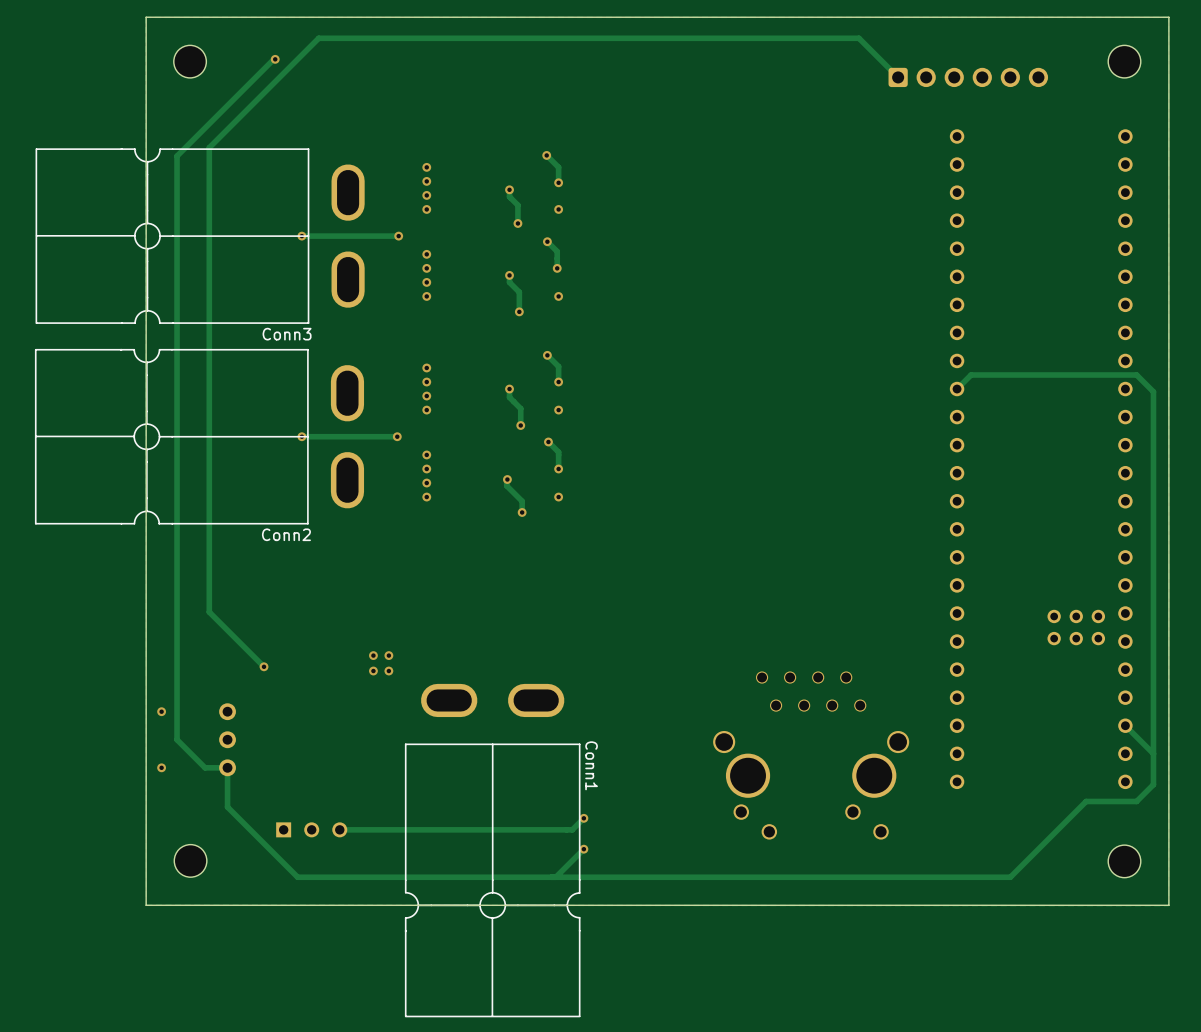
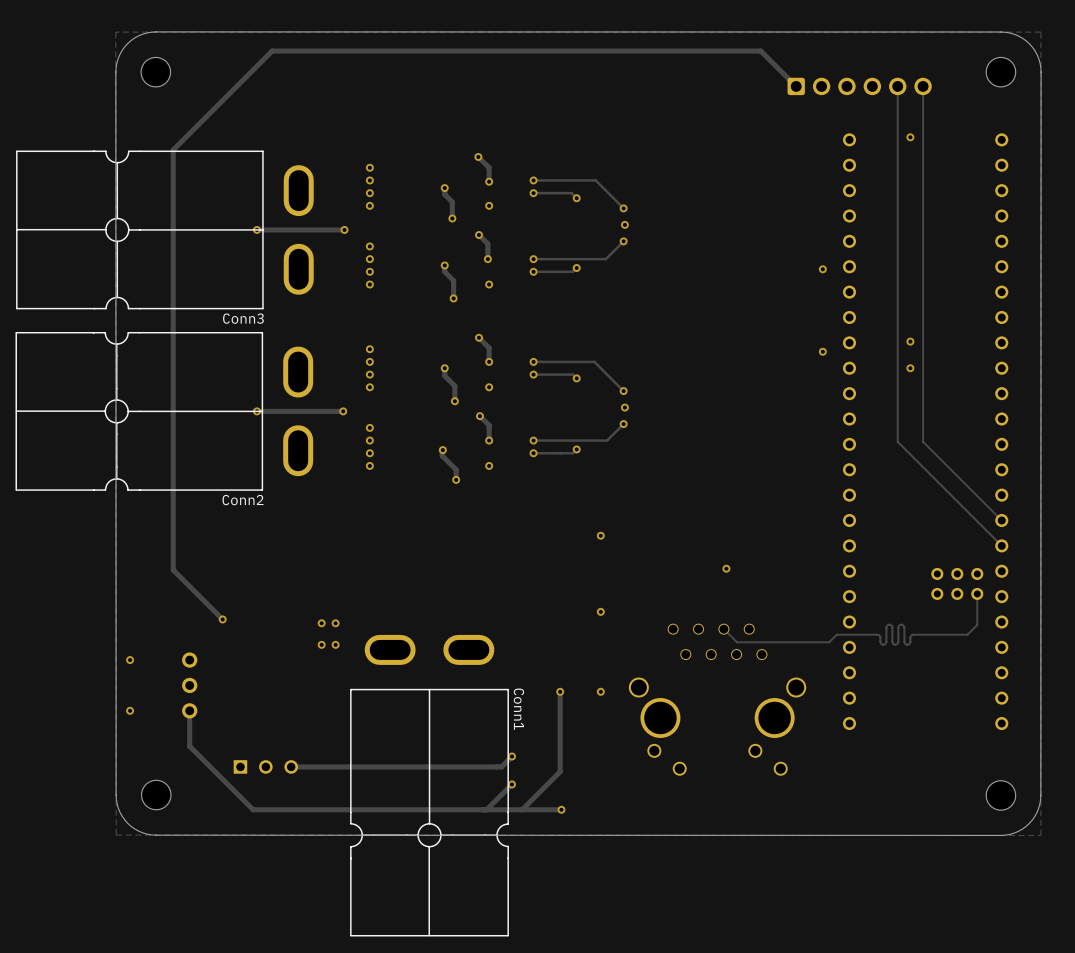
board edge: (1168, 17) (146, 17) (146, 905) (1168, 905) (1168, 17) -> (155, 31) (1001, 32) (1018, 35) (1029, 43) (1037, 54) (1041, 72) (1040, 795) (1036, 812) (1029, 823) (1013, 833) (1000, 835) (156, 835) (138, 831) (127, 823) (118, 808) (116, 795) (115, 72) (118, 58) (127, 43) (142, 34) (155, 31)
track: (275, 59) (177, 156) (177, 739) (205, 767) (227, 767) -> none
via: (275, 59) -> none
track: none -> (897, 86) (897, 441) (1001, 545)
track: none -> (923, 86) (923, 441) (1001, 520)
via: none -> (910, 137)
track: none -> (533, 180) (595, 180) (623, 208)
via: none -> (533, 180)
track: none -> (533, 193) (571, 193) (576, 198)
via: none -> (533, 193)
via: none -> (576, 198)
via: none -> (623, 208)
via: none -> (624, 224)
track: none -> (623, 241) (605, 259) (533, 259)
via: none -> (623, 241)
via: none -> (533, 259)
track: none -> (576, 268) (572, 271) (533, 271)
via: none -> (576, 268)
via: none -> (822, 269)
via: none -> (533, 271)
via: none -> (910, 341)
via: none -> (822, 351)
track: none -> (533, 361) (594, 361) (623, 391)
via: none -> (533, 361)
track: (957, 389) (971, 374) (1136, 374) (1153, 391) (1153, 784) (1136, 801) (1086, 801) (1010, 877) (638, 877) -> none
via: none -> (910, 368)
track: none -> (533, 374) (572, 374) (576, 378)
via: none -> (533, 374)
via: none -> (576, 378)
via: none -> (623, 391)
via: none -> (624, 407)
track: none -> (623, 424) (607, 440) (533, 440)
via: none -> (623, 424)
via: none -> (533, 440)
track: none -> (576, 449) (572, 453) (533, 453)
via: none -> (576, 449)
via: none -> (533, 453)
via: none -> (600, 535)
via: none -> (726, 568)
track: none -> (977, 593) (977, 624) (967, 634) (912, 634) (907, 644) (904, 642) (904, 627) (901, 624) (898, 626) (898, 642) (895, 644) (892, 642) (892, 627) (889, 624) (886, 626) (886, 642) (883, 644) (877, 634) (836, 634) (829, 642) (737, 642) (723, 629)
via: (373, 655) -> none
via: (388, 655) -> none
via: none -> (600, 611)
via: none -> (321, 644)
via: none -> (335, 644)
track: (1125, 725) (1153, 753) -> none
track: none -> (560, 691) (560, 771) (522, 809)
via: none -> (560, 691)
via: none -> (600, 691)
via: none -> (561, 809)

